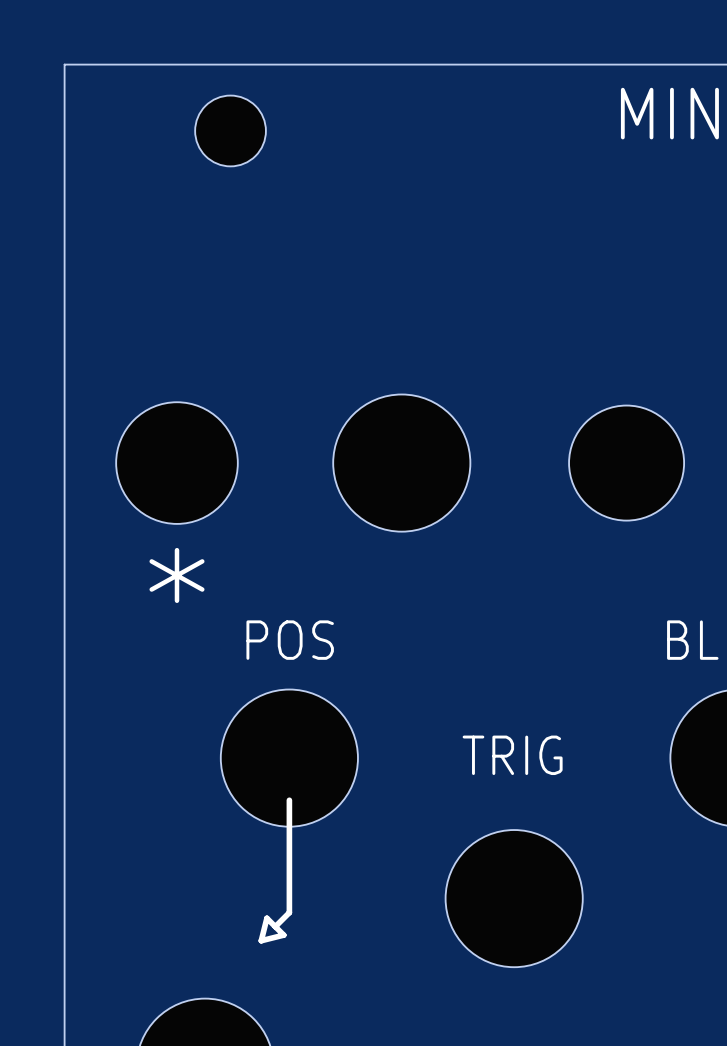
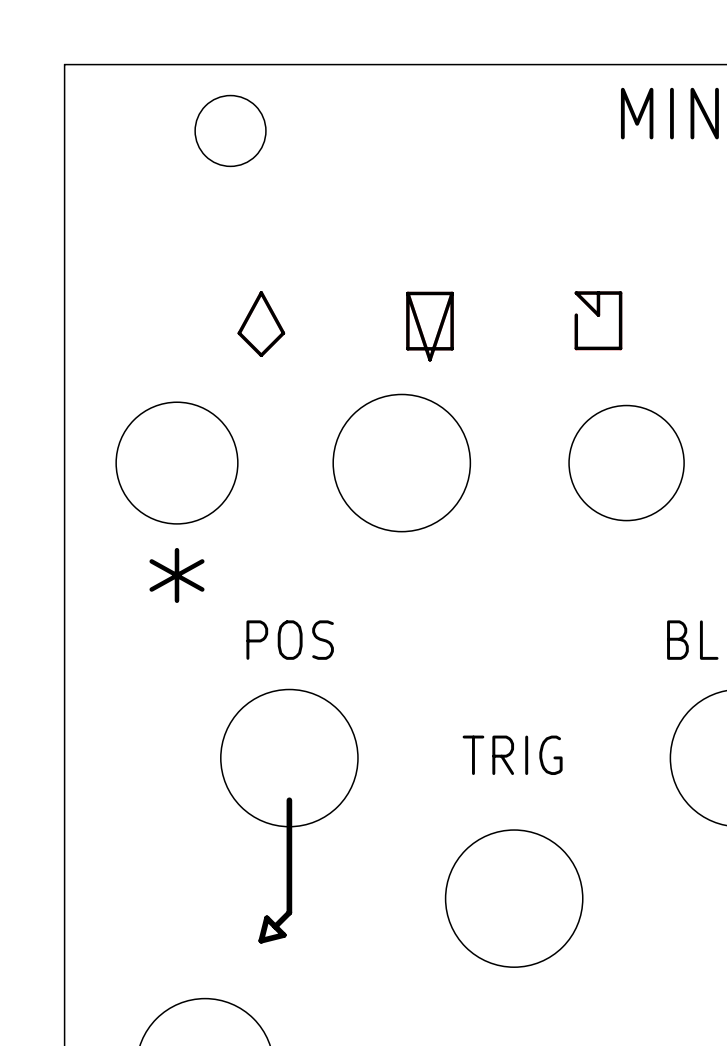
line: none -> (261, 292) (283, 333) (261, 355) (239, 333) (261, 292)
line: none -> (407, 293) (452, 293)
line: none -> (407, 293) (407, 348) (452, 348) (452, 293)
line: none -> (407, 293) (430, 359) (452, 293)
line: none -> (598, 293) (598, 315) (576, 293) (620, 293) (620, 348) (576, 348) (576, 315)

